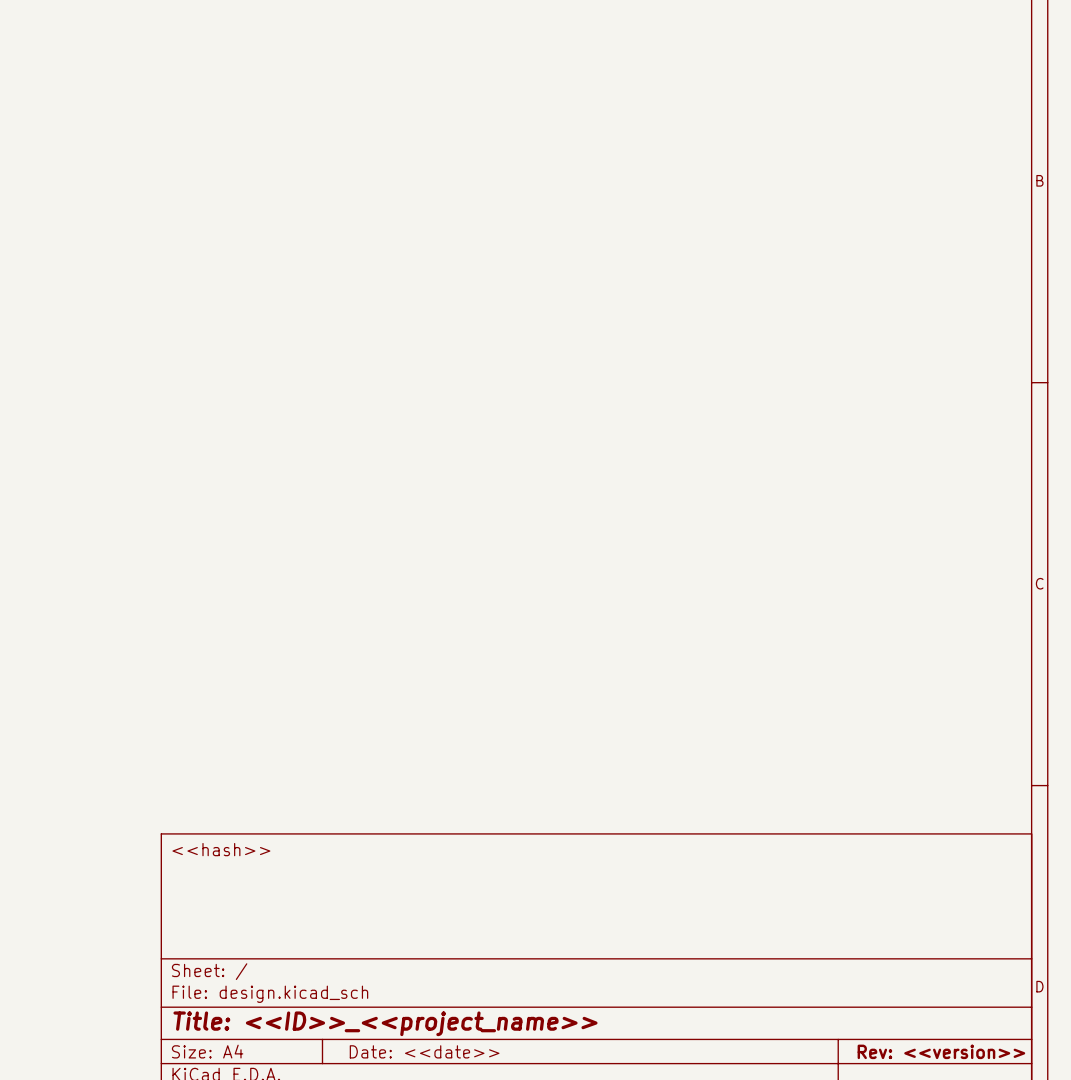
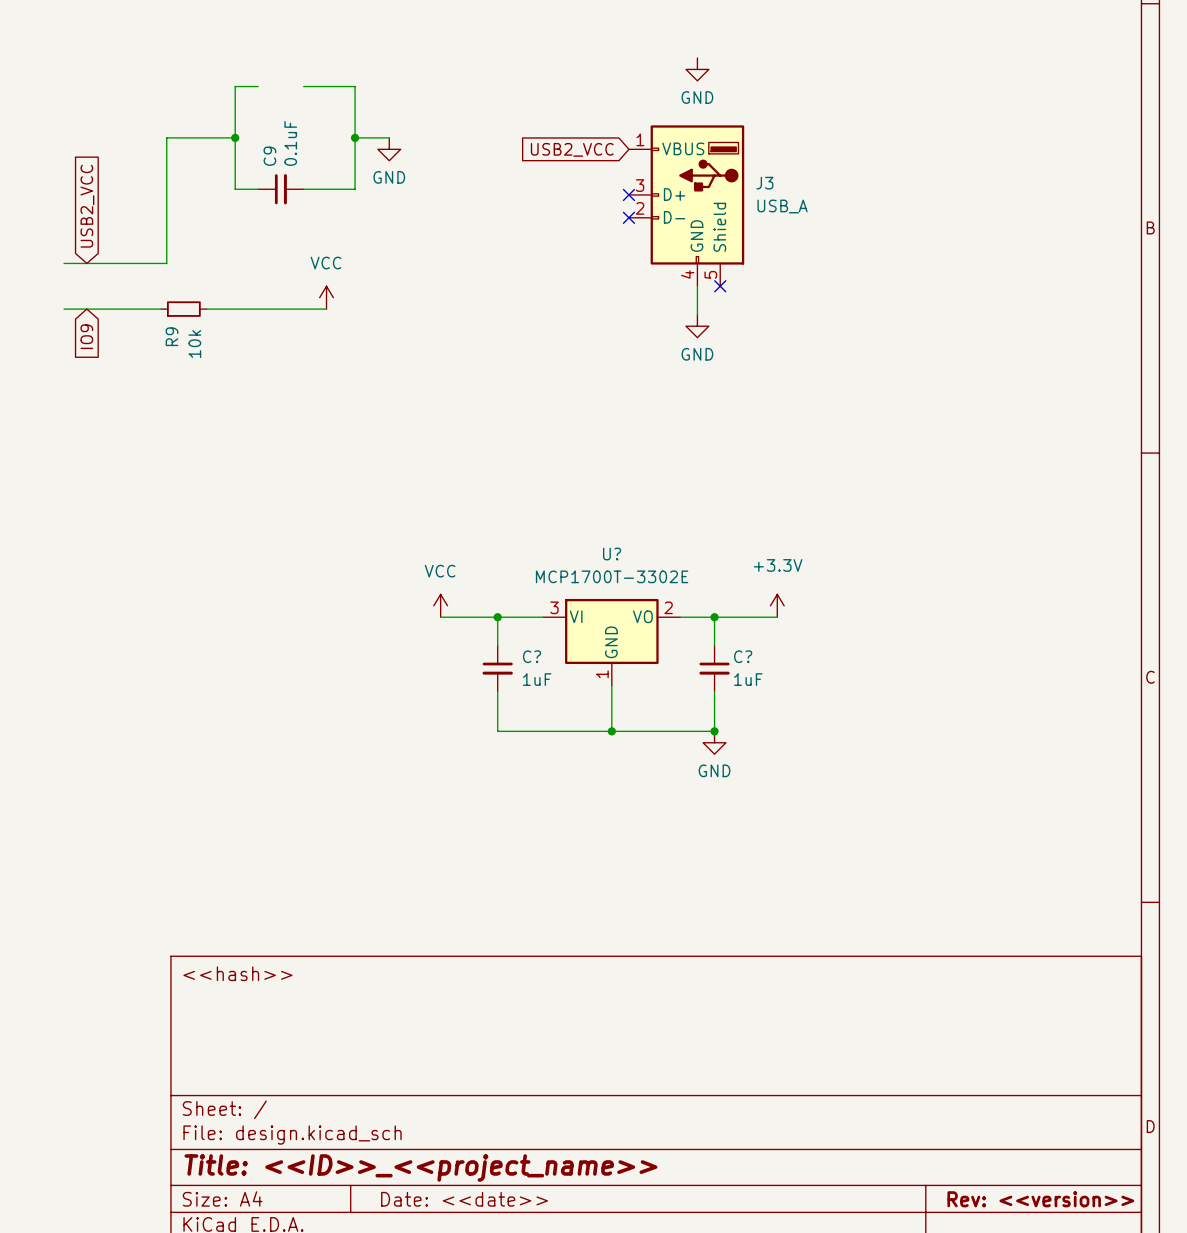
power symbol: none -> GND (697, 69)
wire: none -> (258, 86) (235, 86) (235, 189) (258, 189)
wire: none -> (303, 86) (355, 86) (355, 189) (303, 189)
wire: none -> (235, 137) (166, 137) (166, 263) (64, 263)
junction: none -> (235, 137)
wire: none -> (355, 137) (389, 137)
junction: none -> (355, 137)
power symbol: none -> GND (389, 149)
global label: none -> USB2_VCC (572, 149)
C9: none -> 0.1uF (280, 189)
no-connect mark: none -> (628, 194)
J3: none -> USB_A (686, 205)
global label: none -> USB2_VCC (87, 206)
no-connect mark: none -> (628, 217)
wire: none -> (697, 286) (697, 314)
no-connect mark: none -> (720, 286)
power symbol: none -> VCC (326, 297)
wire: none -> (64, 309) (161, 309)
R9: none -> 10k (183, 309)
wire: none -> (206, 309) (326, 309)
power symbol: none -> GND (697, 326)
global label: none -> IO9 (86, 336)
power symbol: none -> VCC (440, 605)
power symbol: none -> +3.3V (777, 605)
wire: none -> (440, 617) (543, 617)
wire: none -> (497, 617) (497, 645)
junction: none -> (497, 617)
wire: none -> (680, 617) (777, 617)
wire: none -> (714, 617) (714, 645)
junction: none -> (714, 617)
U?: none -> MCP1700T-3302E (611, 642)
C?: none -> 1uF (497, 668)
C?: none -> 1uF (714, 668)
wire: none -> (611, 685) (611, 731)
wire: none -> (497, 691) (497, 731) (714, 731) (714, 691)
junction: none -> (611, 731)
junction: none -> (714, 731)
power symbol: none -> GND (714, 742)

